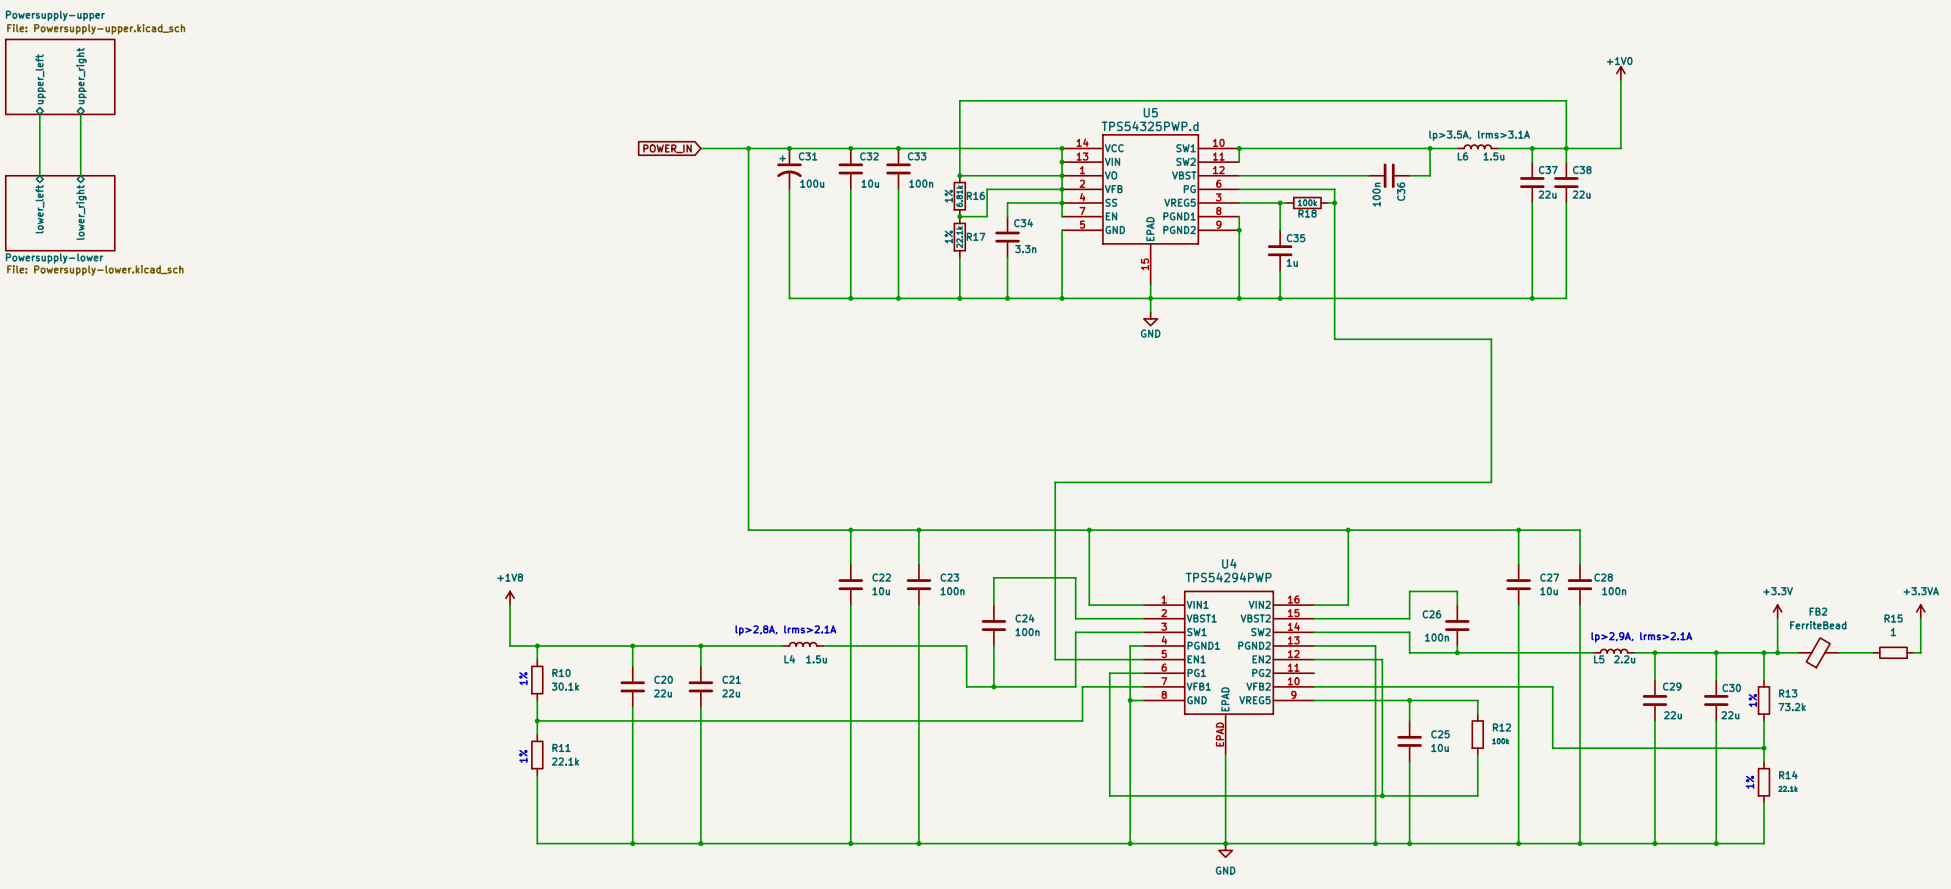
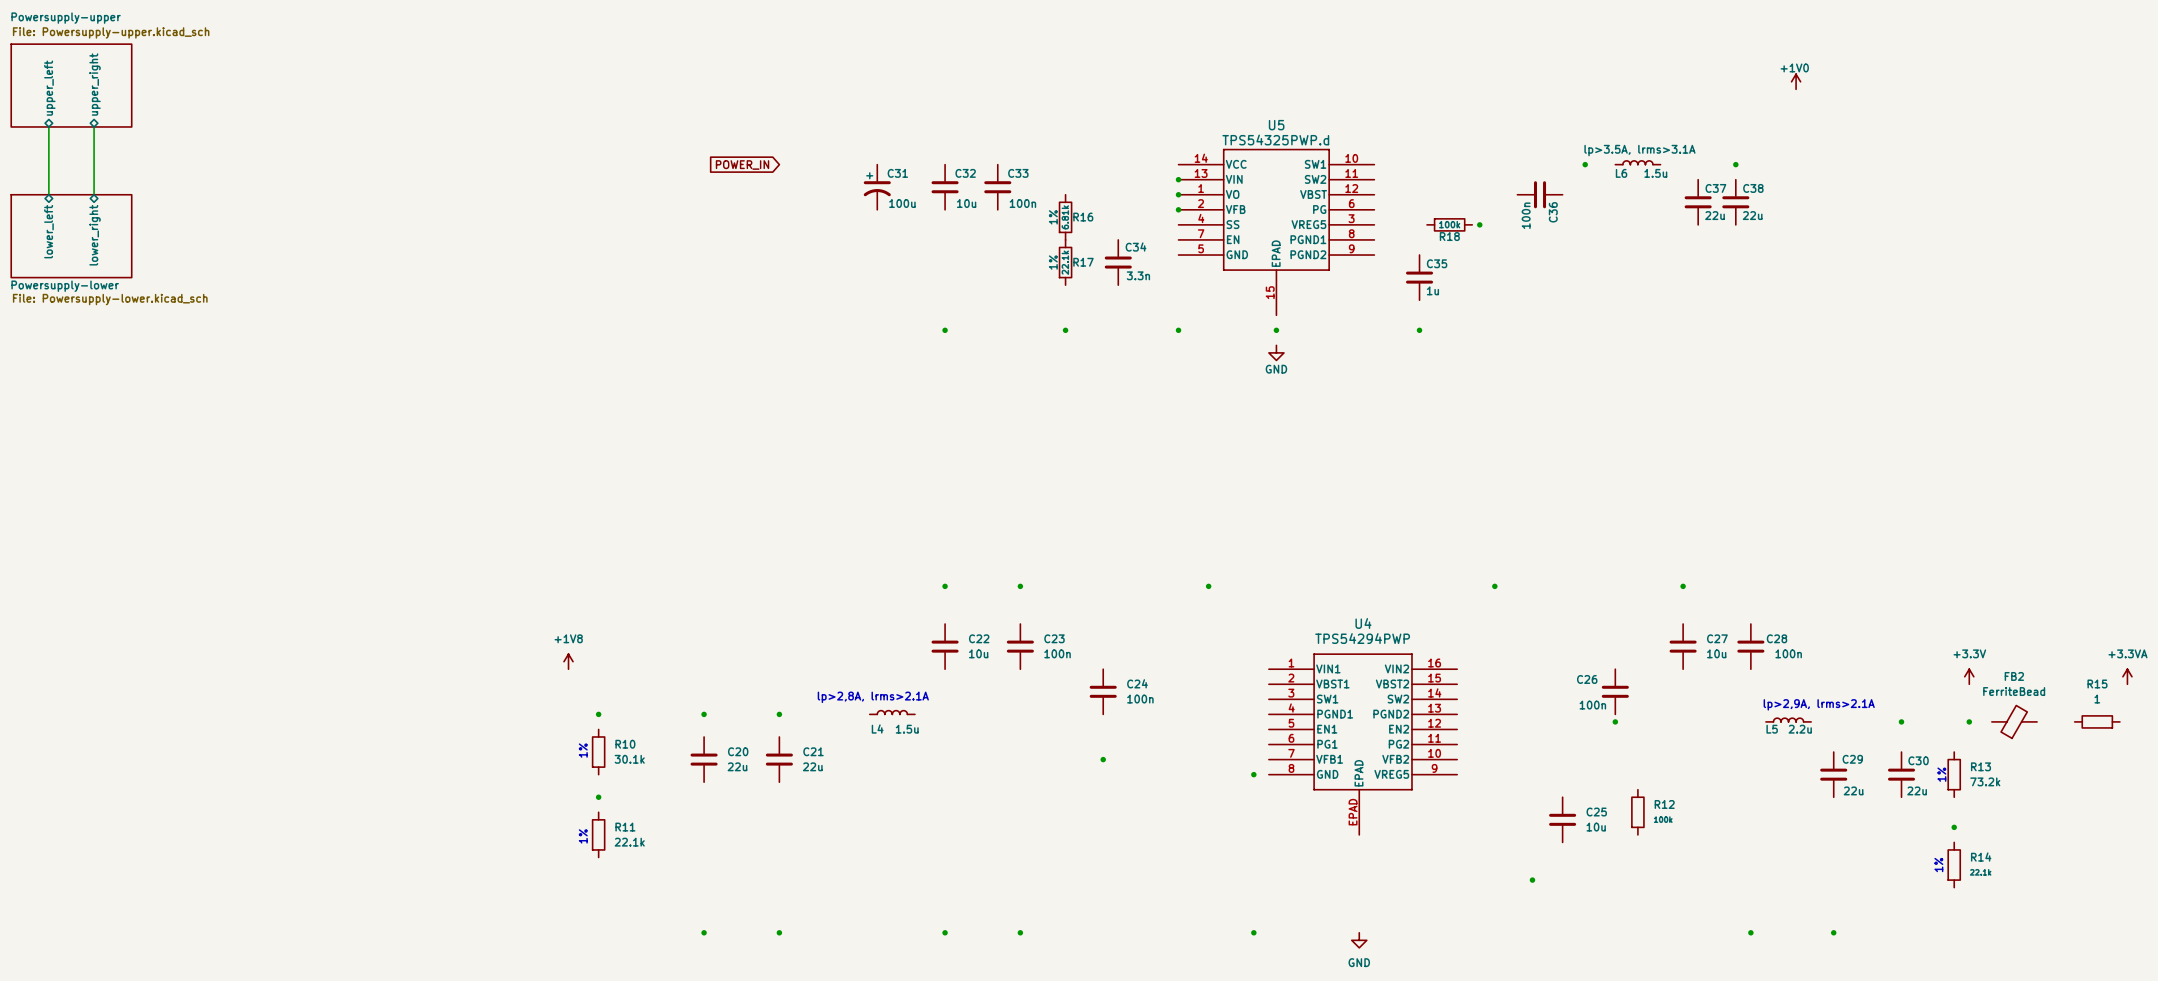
wire: (1620, 80) (1620, 148) (1498, 148) -> none
wire: (700, 148) (1062, 148) (1062, 216) -> none
wire: (748, 148) (748, 530) (1579, 530) (1579, 564) -> none
junction: (748, 148) -> none
junction: (789, 148) -> none
junction: (850, 148) -> none
junction: (898, 148) -> none
junction: (1062, 148) -> none
junction: (1239, 148) -> none
wire: (1430, 148) (1430, 175) (1409, 175) -> none
wire: (1457, 148) (1239, 148) (1239, 162) -> none
wire: (1532, 148) (1532, 162) -> none
junction: (1532, 148) -> none
wire: (1566, 162) (1566, 100) (959, 100) (959, 175) (1062, 175) -> none
junction: (959, 175) -> none
wire: (1239, 175) (1368, 175) -> none
wire: (789, 189) (789, 298) (1566, 298) (1566, 203) -> none
wire: (850, 189) (850, 298) -> none
wire: (898, 189) (898, 298) -> none
wire: (1062, 189) (987, 189) (987, 216) (959, 216) -> none
wire: (1239, 189) (1334, 189) (1334, 339) (1491, 339) (1491, 482) (1055, 482) (1055, 659) (1143, 659) -> none
wire: (1062, 203) (1007, 203) (1007, 216) -> none
junction: (1062, 203) -> none
wire: (1239, 203) (1286, 203) -> none
wire: (1280, 203) (1280, 230) -> none
junction: (1280, 203) -> none
wire: (1327, 203) (1334, 203) -> none
wire: (1532, 203) (1532, 298) -> none
junction: (959, 216) -> none
wire: (1239, 216) (1239, 298) -> none
wire: (1062, 230) (1062, 298) -> none
junction: (1239, 230) -> none
wire: (959, 257) (959, 298) -> none
wire: (1007, 257) (1007, 298) -> none
wire: (1280, 271) (1280, 298) -> none
wire: (1150, 284) (1150, 312) -> none
junction: (898, 298) -> none
junction: (1007, 298) -> none
junction: (1239, 298) -> none
junction: (1532, 298) -> none
wire: (850, 530) (850, 564) -> none
wire: (918, 530) (918, 564) -> none
wire: (1089, 530) (1089, 605) (1143, 605) -> none
wire: (1348, 530) (1348, 605) (1314, 605) -> none
wire: (1518, 530) (1518, 564) -> none
wire: (510, 605) (510, 645) (782, 645) -> none
wire: (850, 605) (850, 843) -> none
wire: (918, 605) (918, 843) -> none
wire: (993, 605) (993, 577) (1075, 577) (1075, 618) (1143, 618) -> none
wire: (1457, 605) (1457, 591) (1409, 591) (1409, 618) (1314, 618) -> none
wire: (1518, 605) (1518, 843) -> none
wire: (1579, 605) (1579, 843) -> none
wire: (1777, 618) (1777, 652) -> none
wire: (1920, 618) (1920, 652) (1913, 652) -> none
wire: (1143, 632) (1075, 632) (1075, 686) (966, 686) (966, 645) (823, 645) -> none
wire: (1314, 632) (1409, 632) (1409, 652) (1593, 652) -> none
wire: (537, 645) (537, 659) -> none
wire: (632, 645) (632, 666) -> none
wire: (700, 645) (700, 666) -> none
wire: (993, 645) (993, 686) -> none
wire: (1143, 645) (1130, 645) (1130, 843) -> none
wire: (1314, 645) (1375, 645) (1375, 843) -> none
wire: (1457, 645) (1457, 652) -> none
wire: (1634, 652) (1798, 652) -> none
wire: (1654, 652) (1654, 680) -> none
junction: (1654, 652) -> none
wire: (1716, 652) (1716, 680) -> none
wire: (1763, 652) (1763, 680) -> none
junction: (1763, 652) -> none
wire: (1838, 652) (1873, 652) -> none
wire: (1314, 659) (1382, 659) (1382, 795) -> none
wire: (1143, 673) (1109, 673) (1109, 795) (1477, 795) (1477, 755) -> none
wire: (1143, 686) (1082, 686) (1082, 720) (537, 720) -> none
wire: (1314, 686) (1552, 686) (1552, 748) (1763, 748) -> none
wire: (537, 700) (537, 734) -> none
wire: (1130, 700) (1143, 700) -> none
wire: (1314, 700) (1477, 700) (1477, 714) -> none
wire: (1409, 700) (1409, 720) -> none
junction: (1409, 700) -> none
wire: (632, 707) (632, 843) -> none
wire: (700, 707) (700, 843) -> none
wire: (1654, 720) (1654, 843) -> none
wire: (1716, 720) (1716, 843) -> none
wire: (1763, 720) (1763, 761) -> none
wire: (1225, 755) (1225, 843) -> none
wire: (1409, 761) (1409, 843) -> none
wire: (537, 775) (537, 843) (1763, 843) (1763, 802) -> none
junction: (1225, 843) -> none
junction: (1375, 843) -> none
junction: (1409, 843) -> none
junction: (1518, 843) -> none
junction: (1716, 843) -> none

